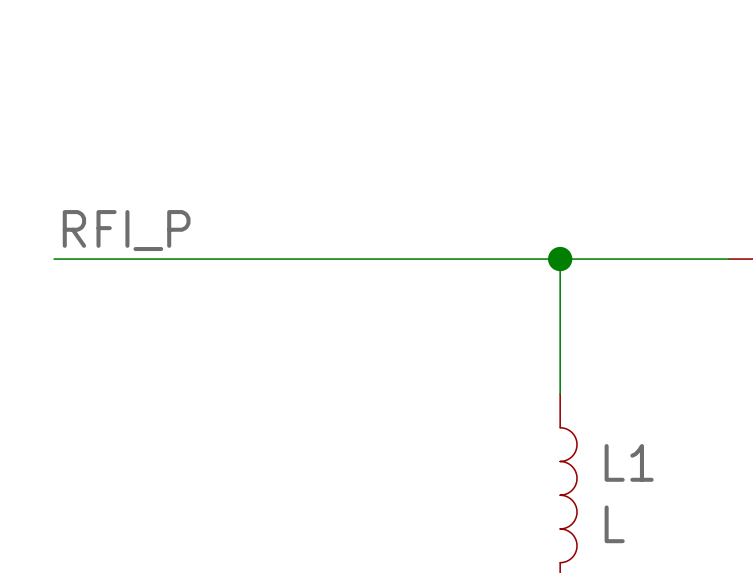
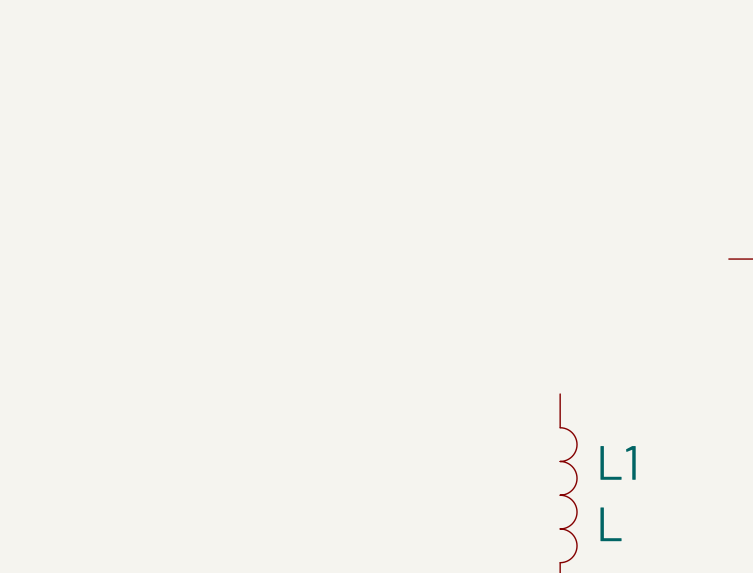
label: RFI_P (126, 230) -> none
wire: (54, 259) (728, 259) -> none
wire: (560, 259) (560, 394) -> none
junction: (560, 259) -> none

